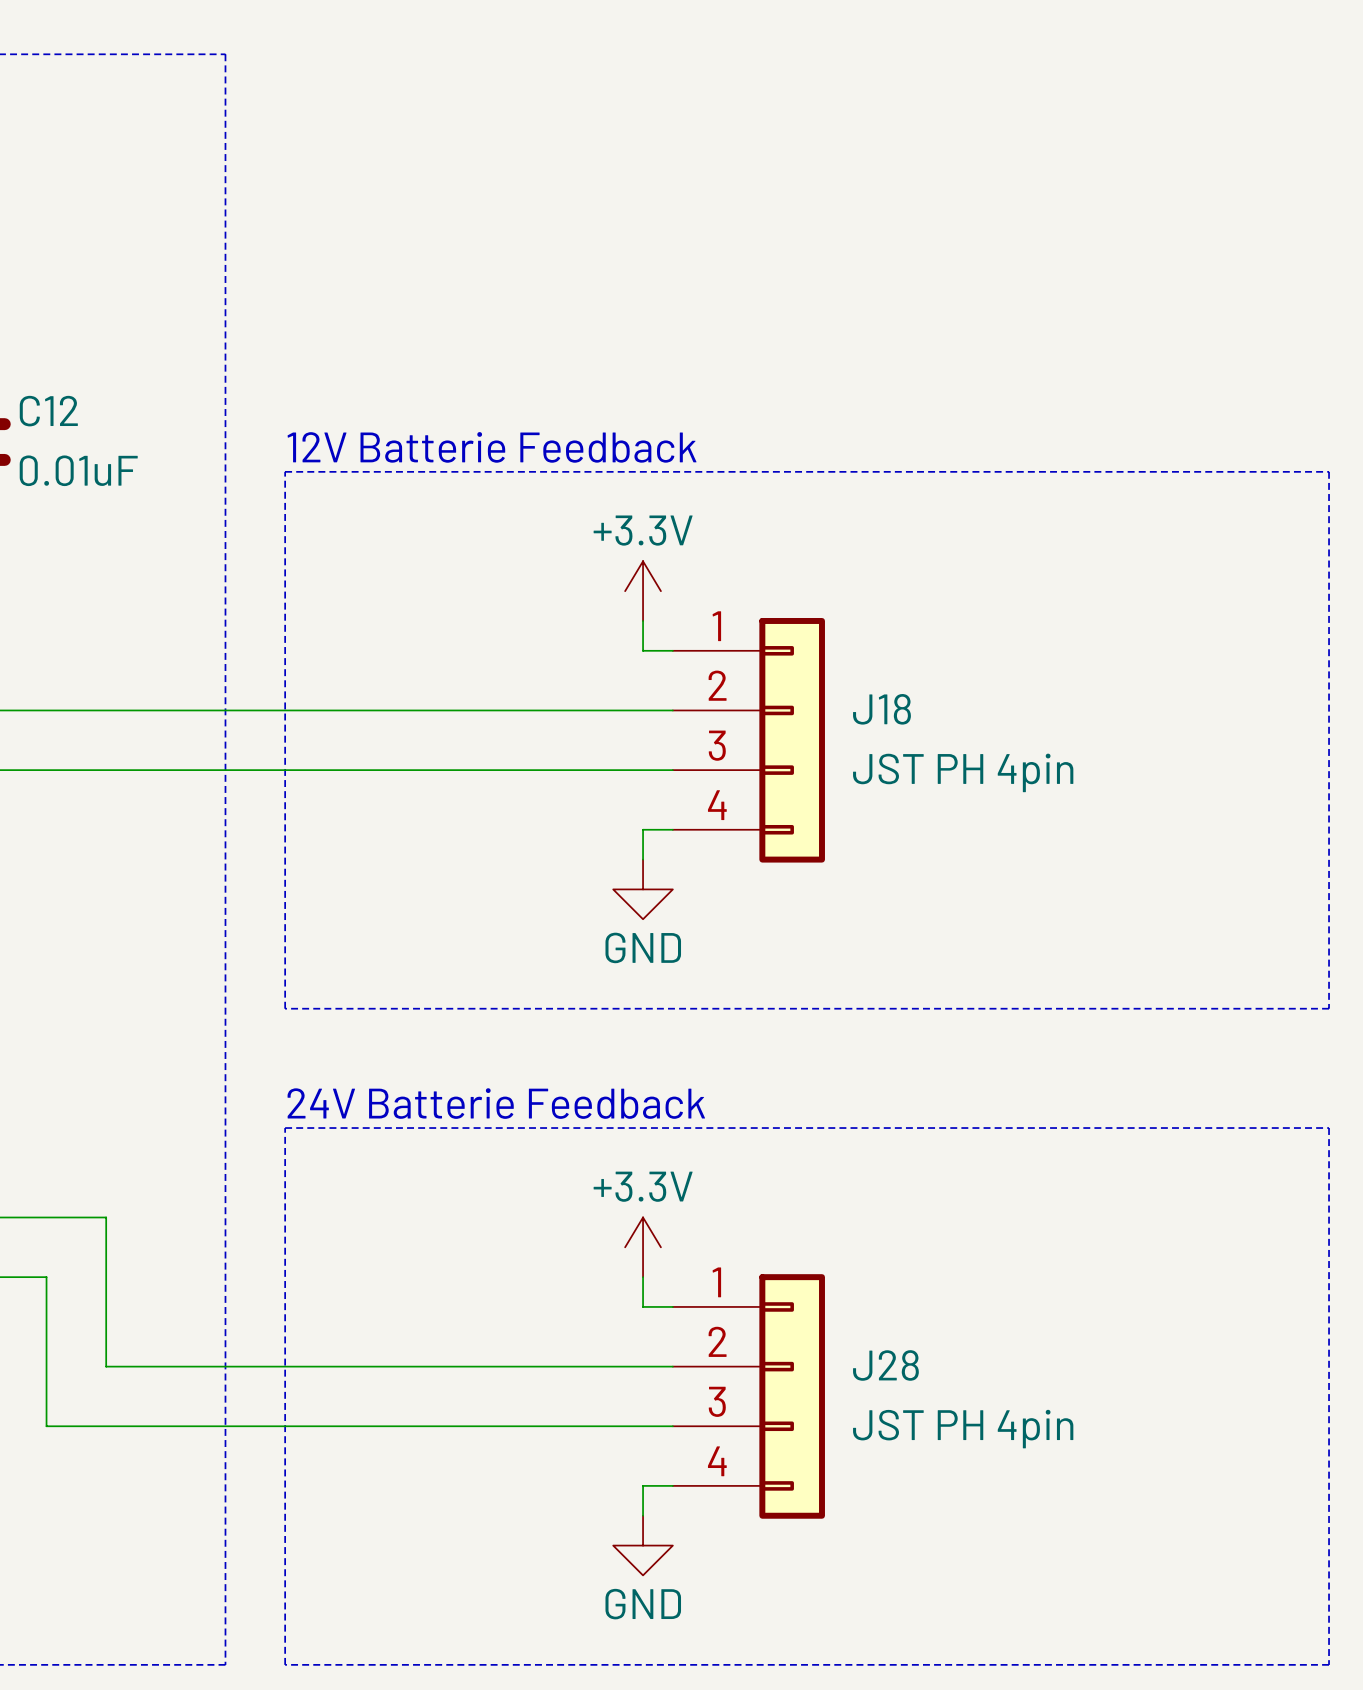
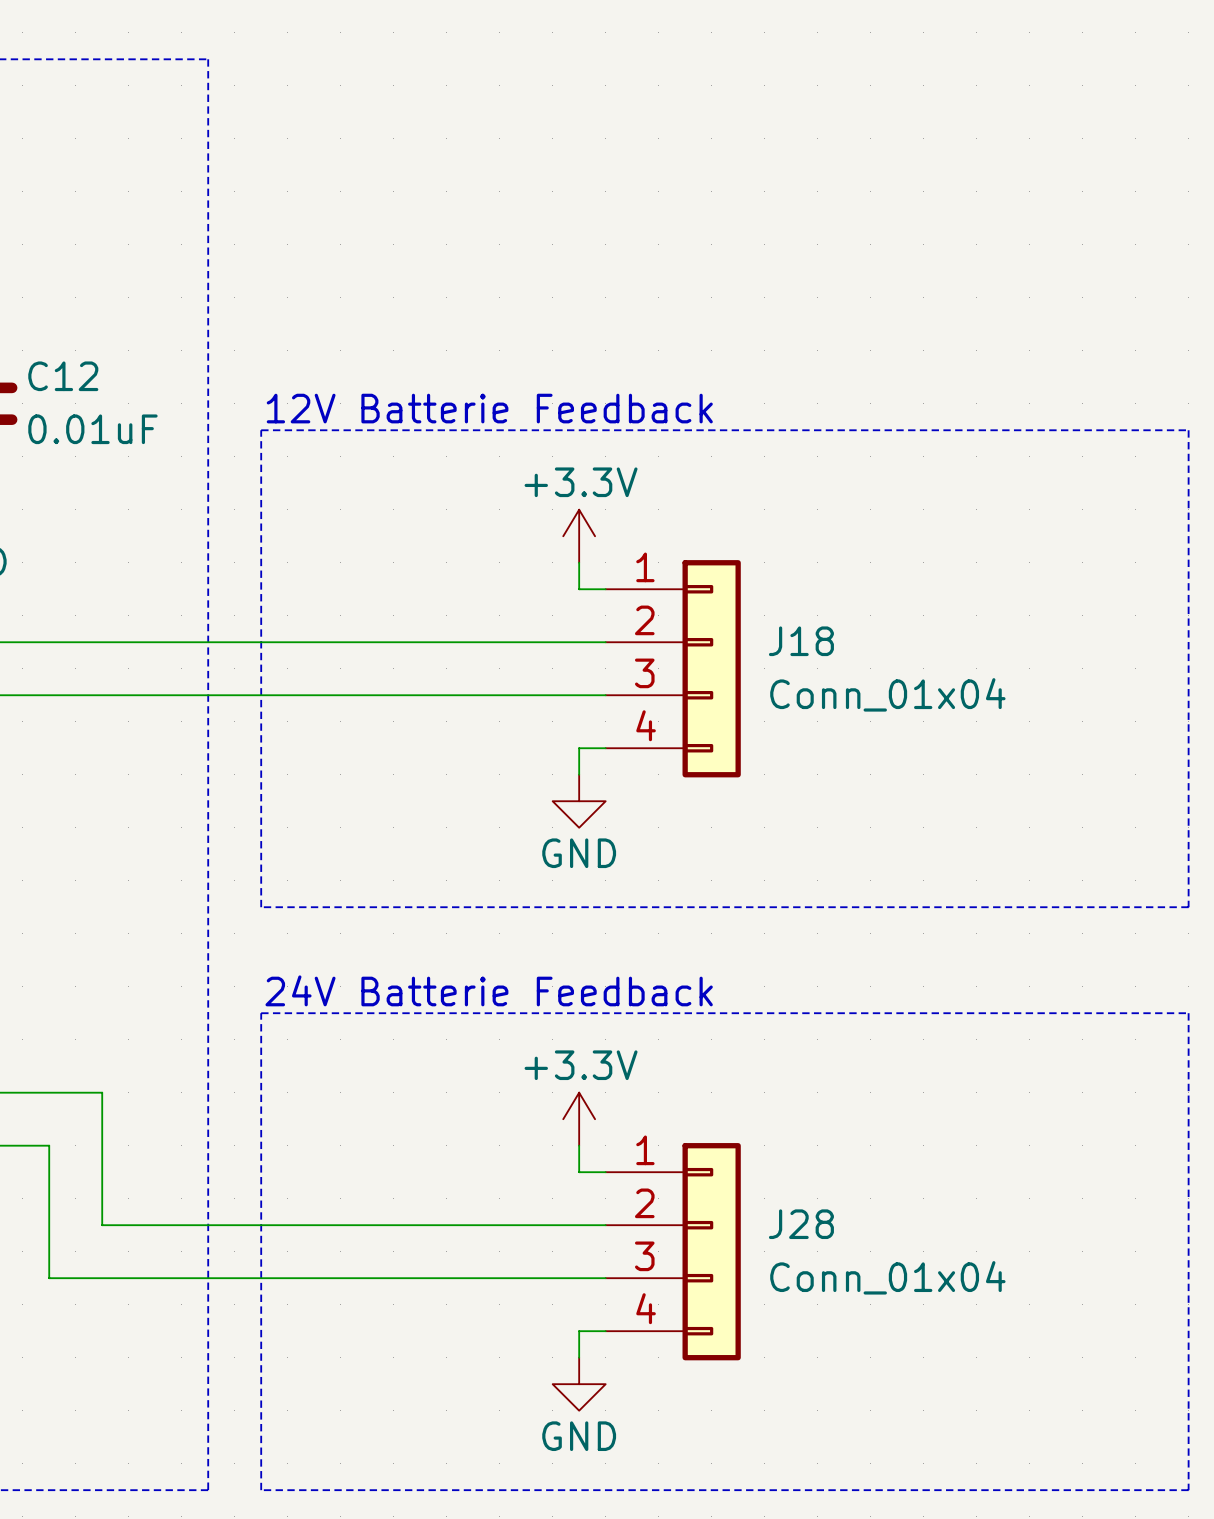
J18 value: JST PH 4pin (963, 772) -> Conn_01x04 (887, 694)
J28 value: JST PH 4pin (963, 1429) -> Conn_01x04 (887, 1277)

